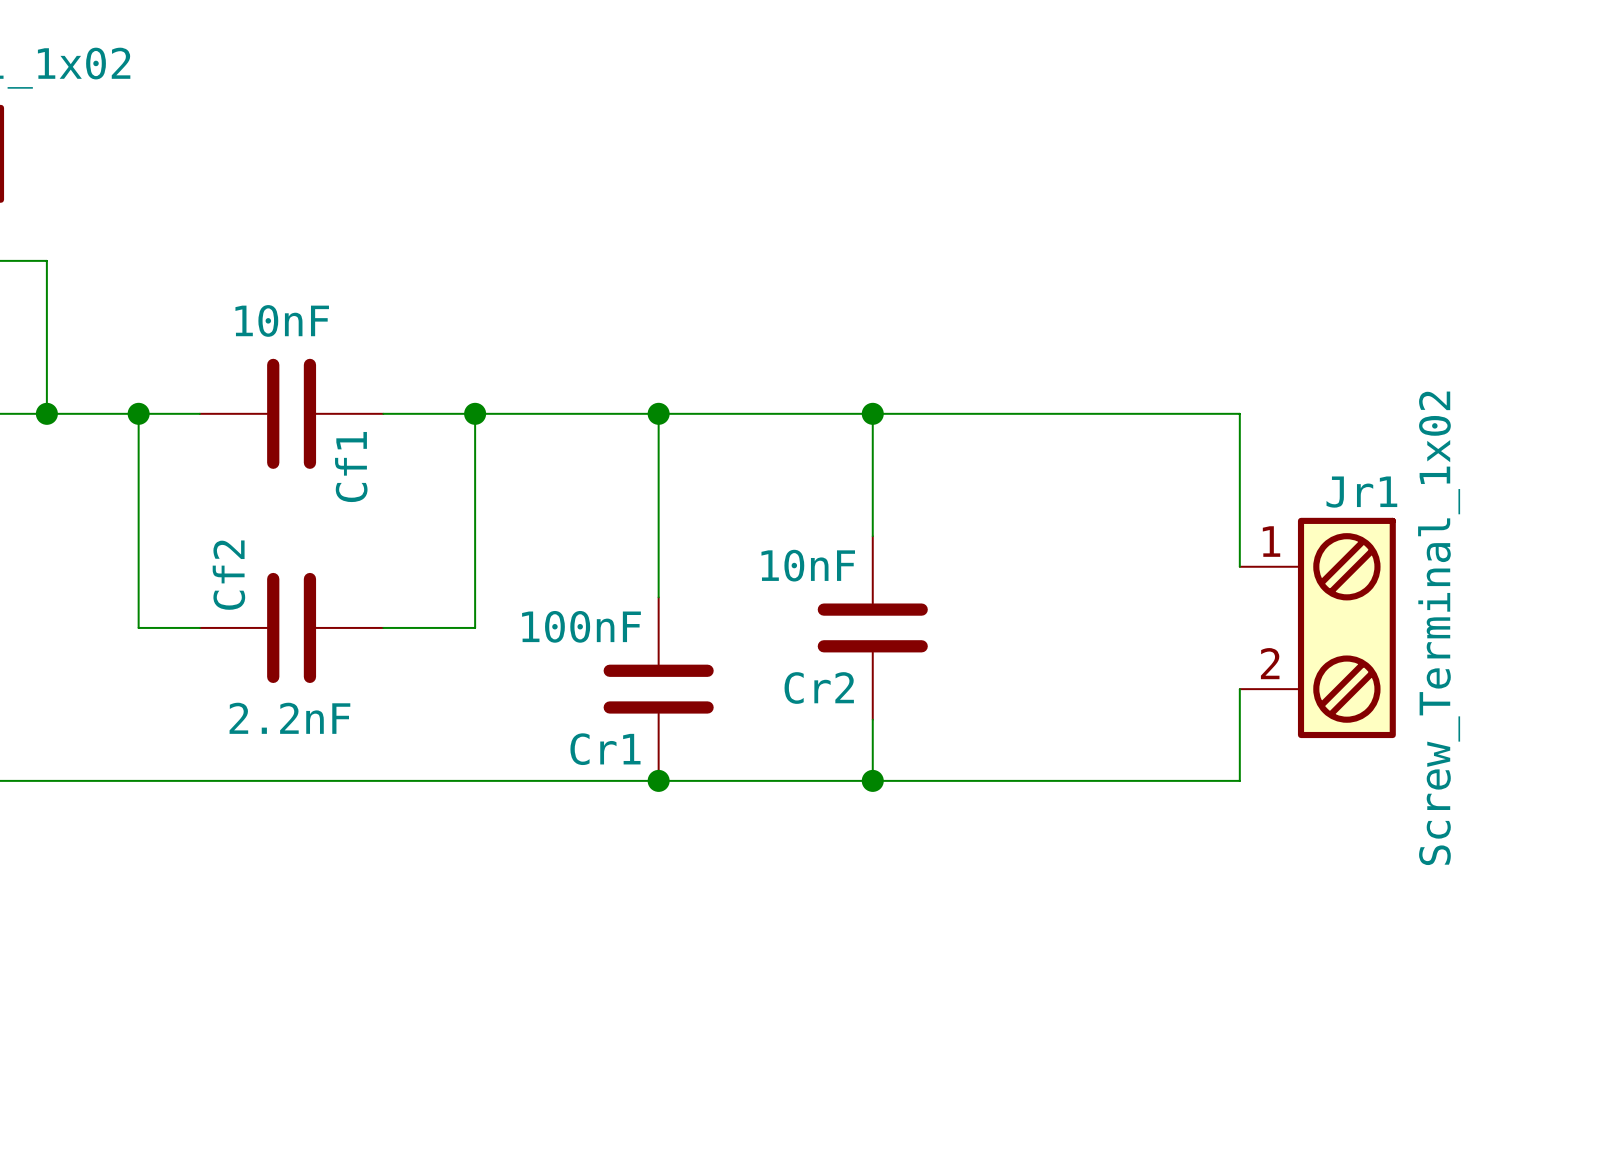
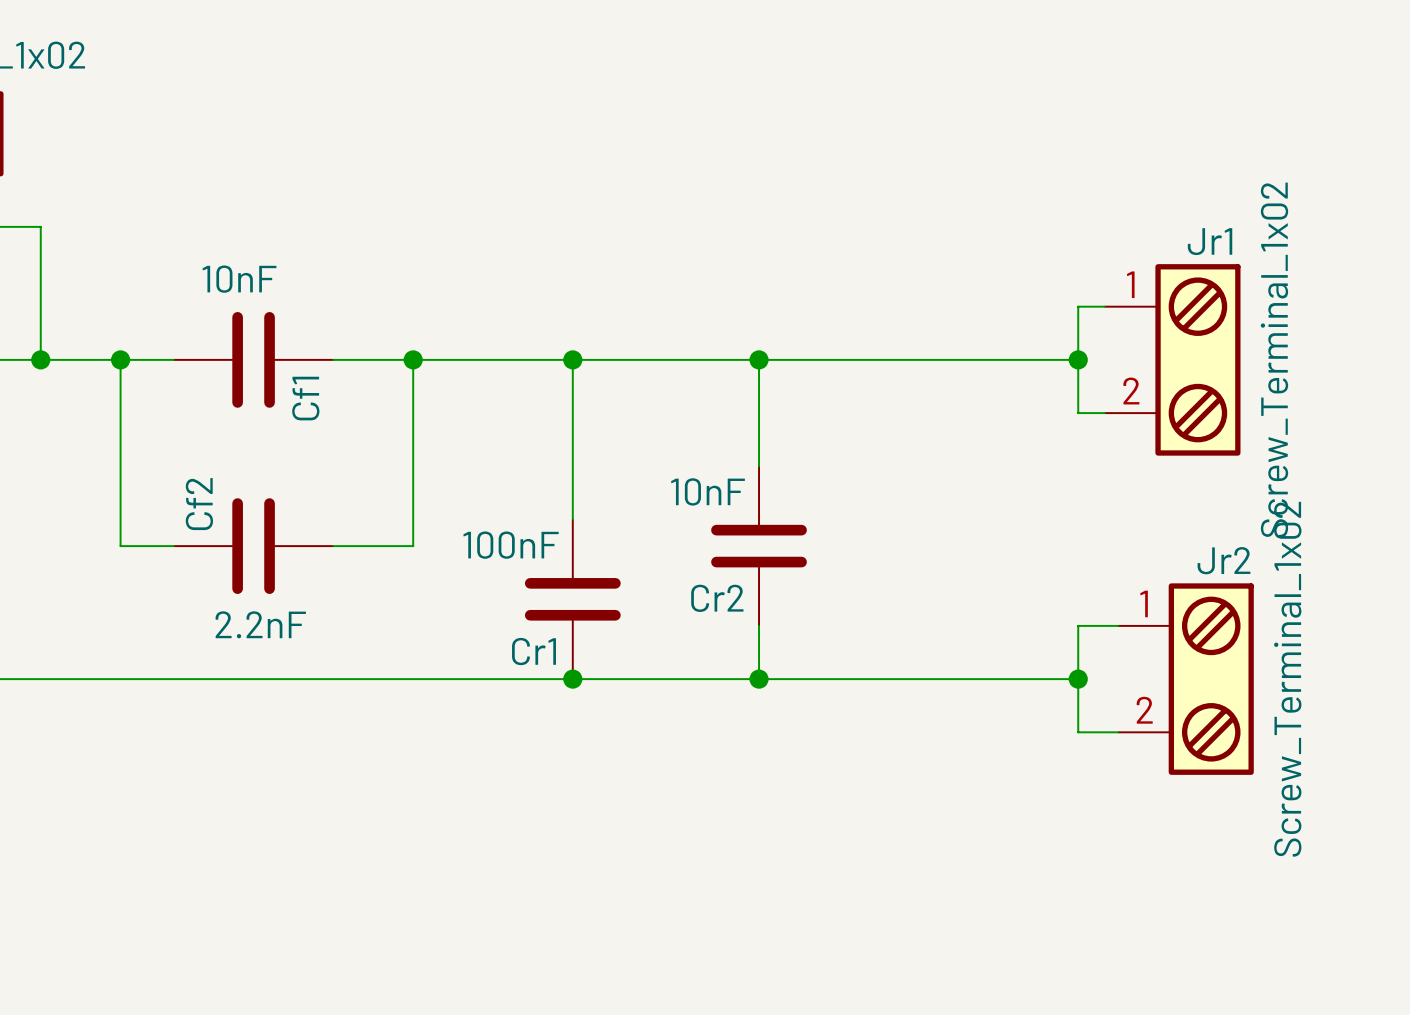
wire: none -> (1104, 306) (1078, 306) (1078, 359)
junction: none -> (1078, 359)
wire: (1239, 475) (1239, 566) -> (1078, 413) (1104, 413)
Jr1 position: (1317, 627) -> (1172, 359)
wire: (1239, 689) (1239, 719) -> (1118, 625) (1078, 625)
wire: none -> (1078, 679) (1078, 732) (1118, 732)
junction: none -> (1078, 679)
Jr2: none -> Screw_Terminal_1x02 (1185, 679)

